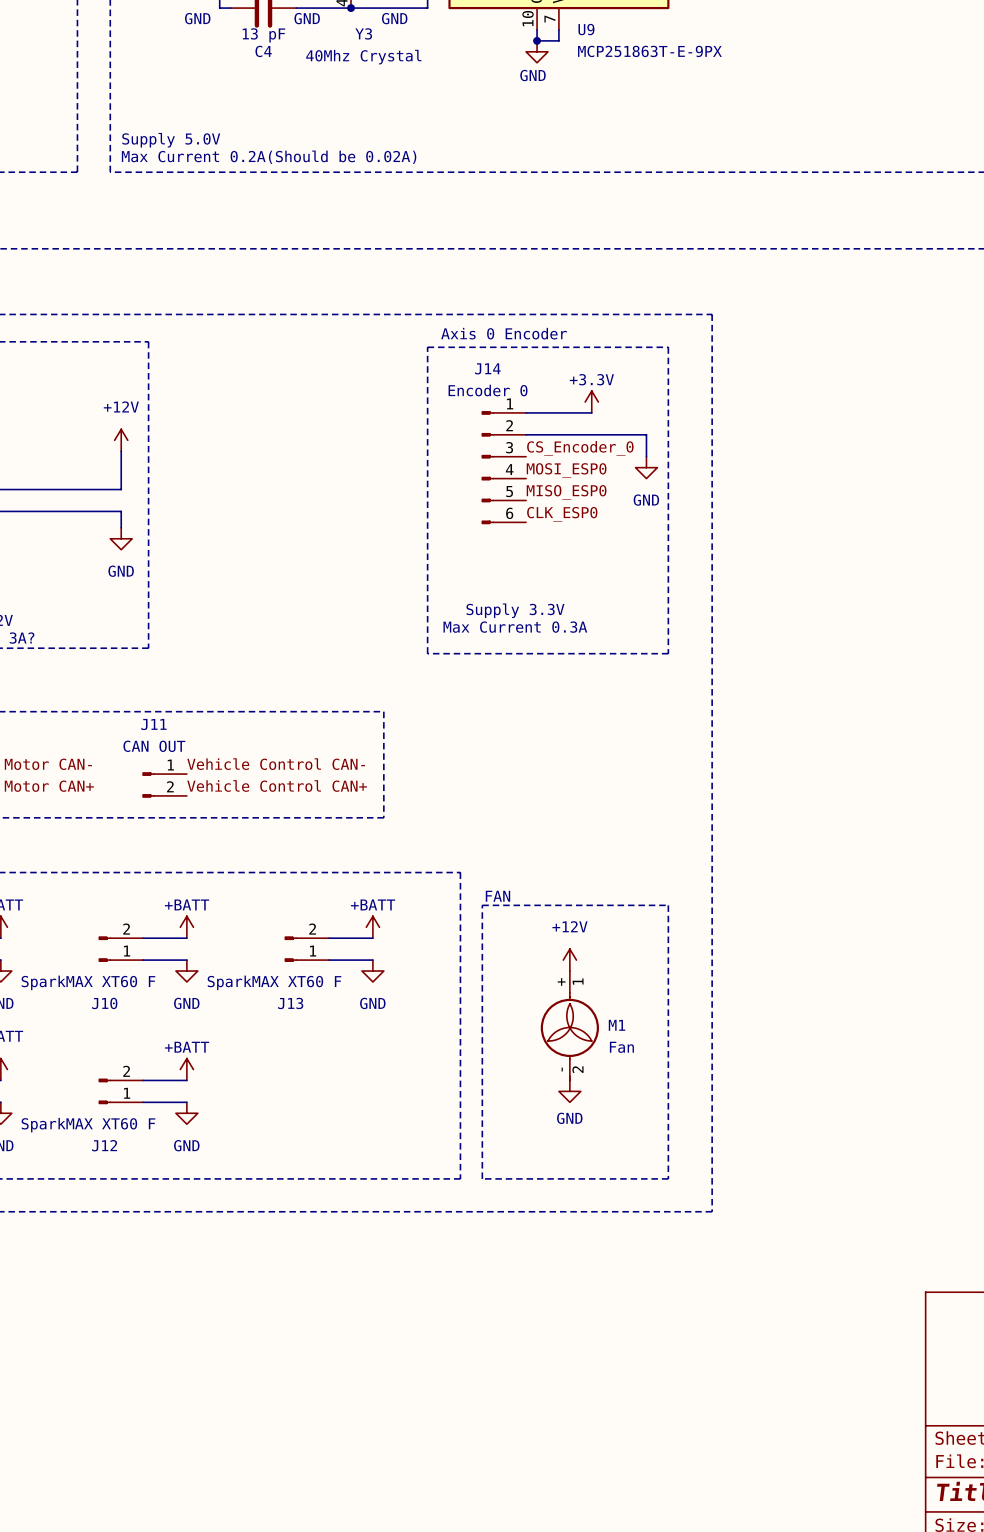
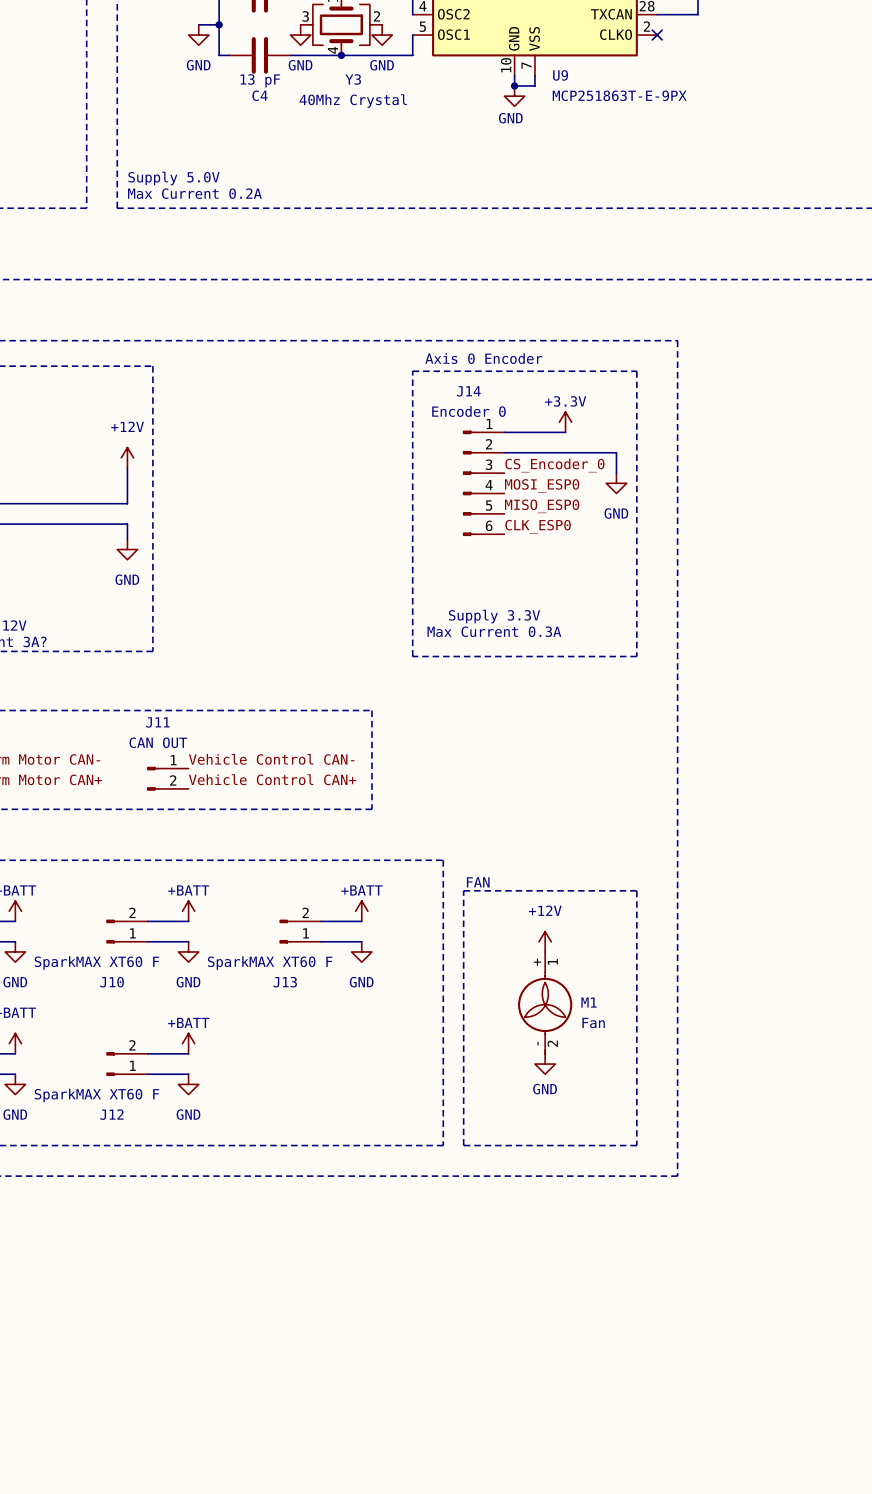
text: Max Current 0.2A(Should be 0.02A) (269, 157) -> Max Current 0.2A (194, 193)

